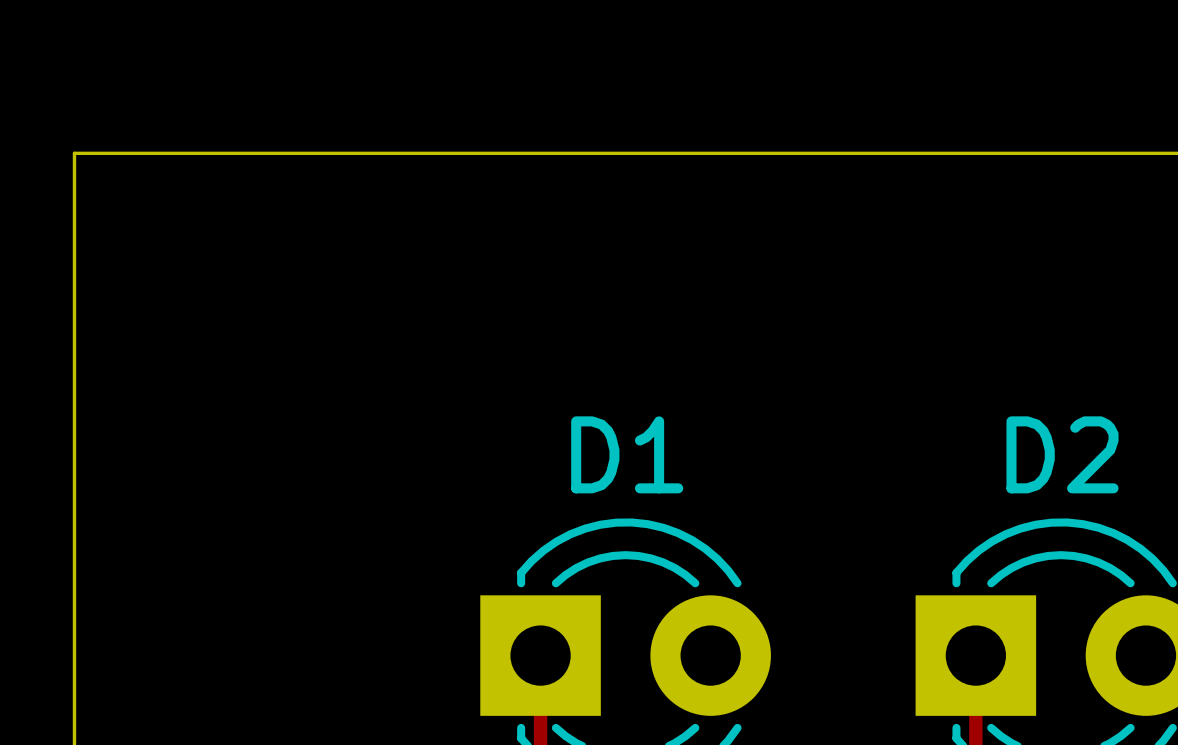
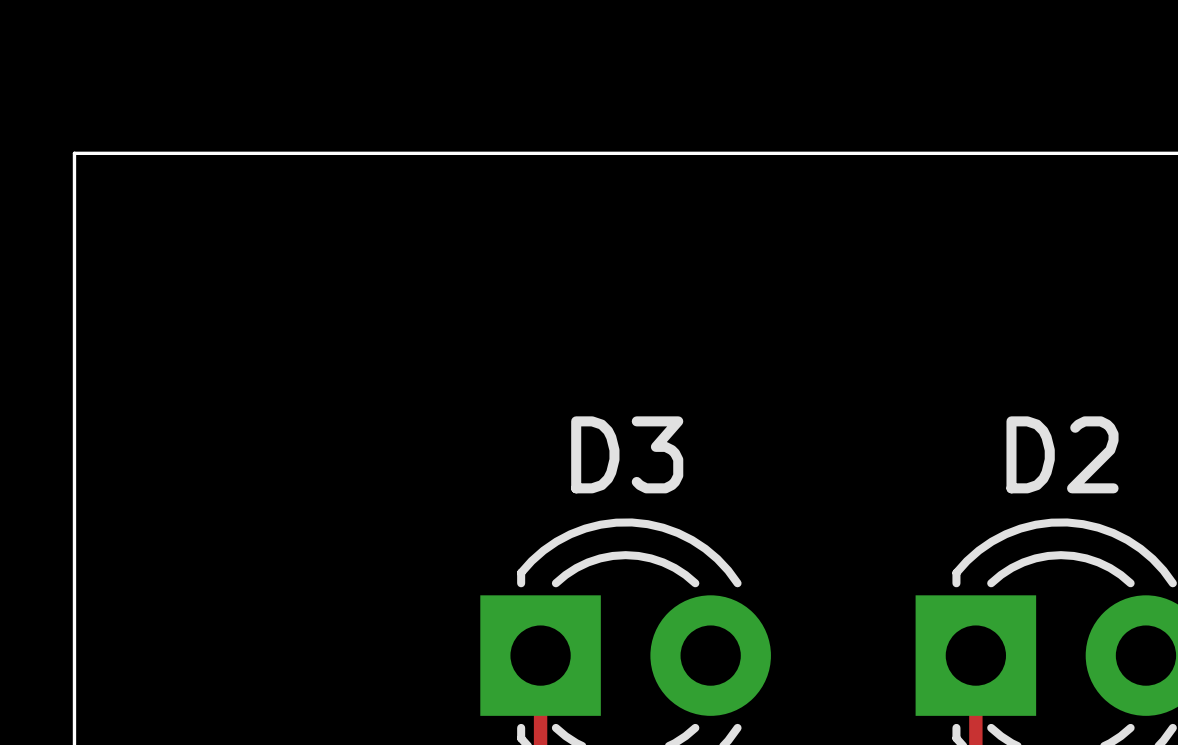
D1 name: D1 (627, 454) -> D3 (627, 454)

